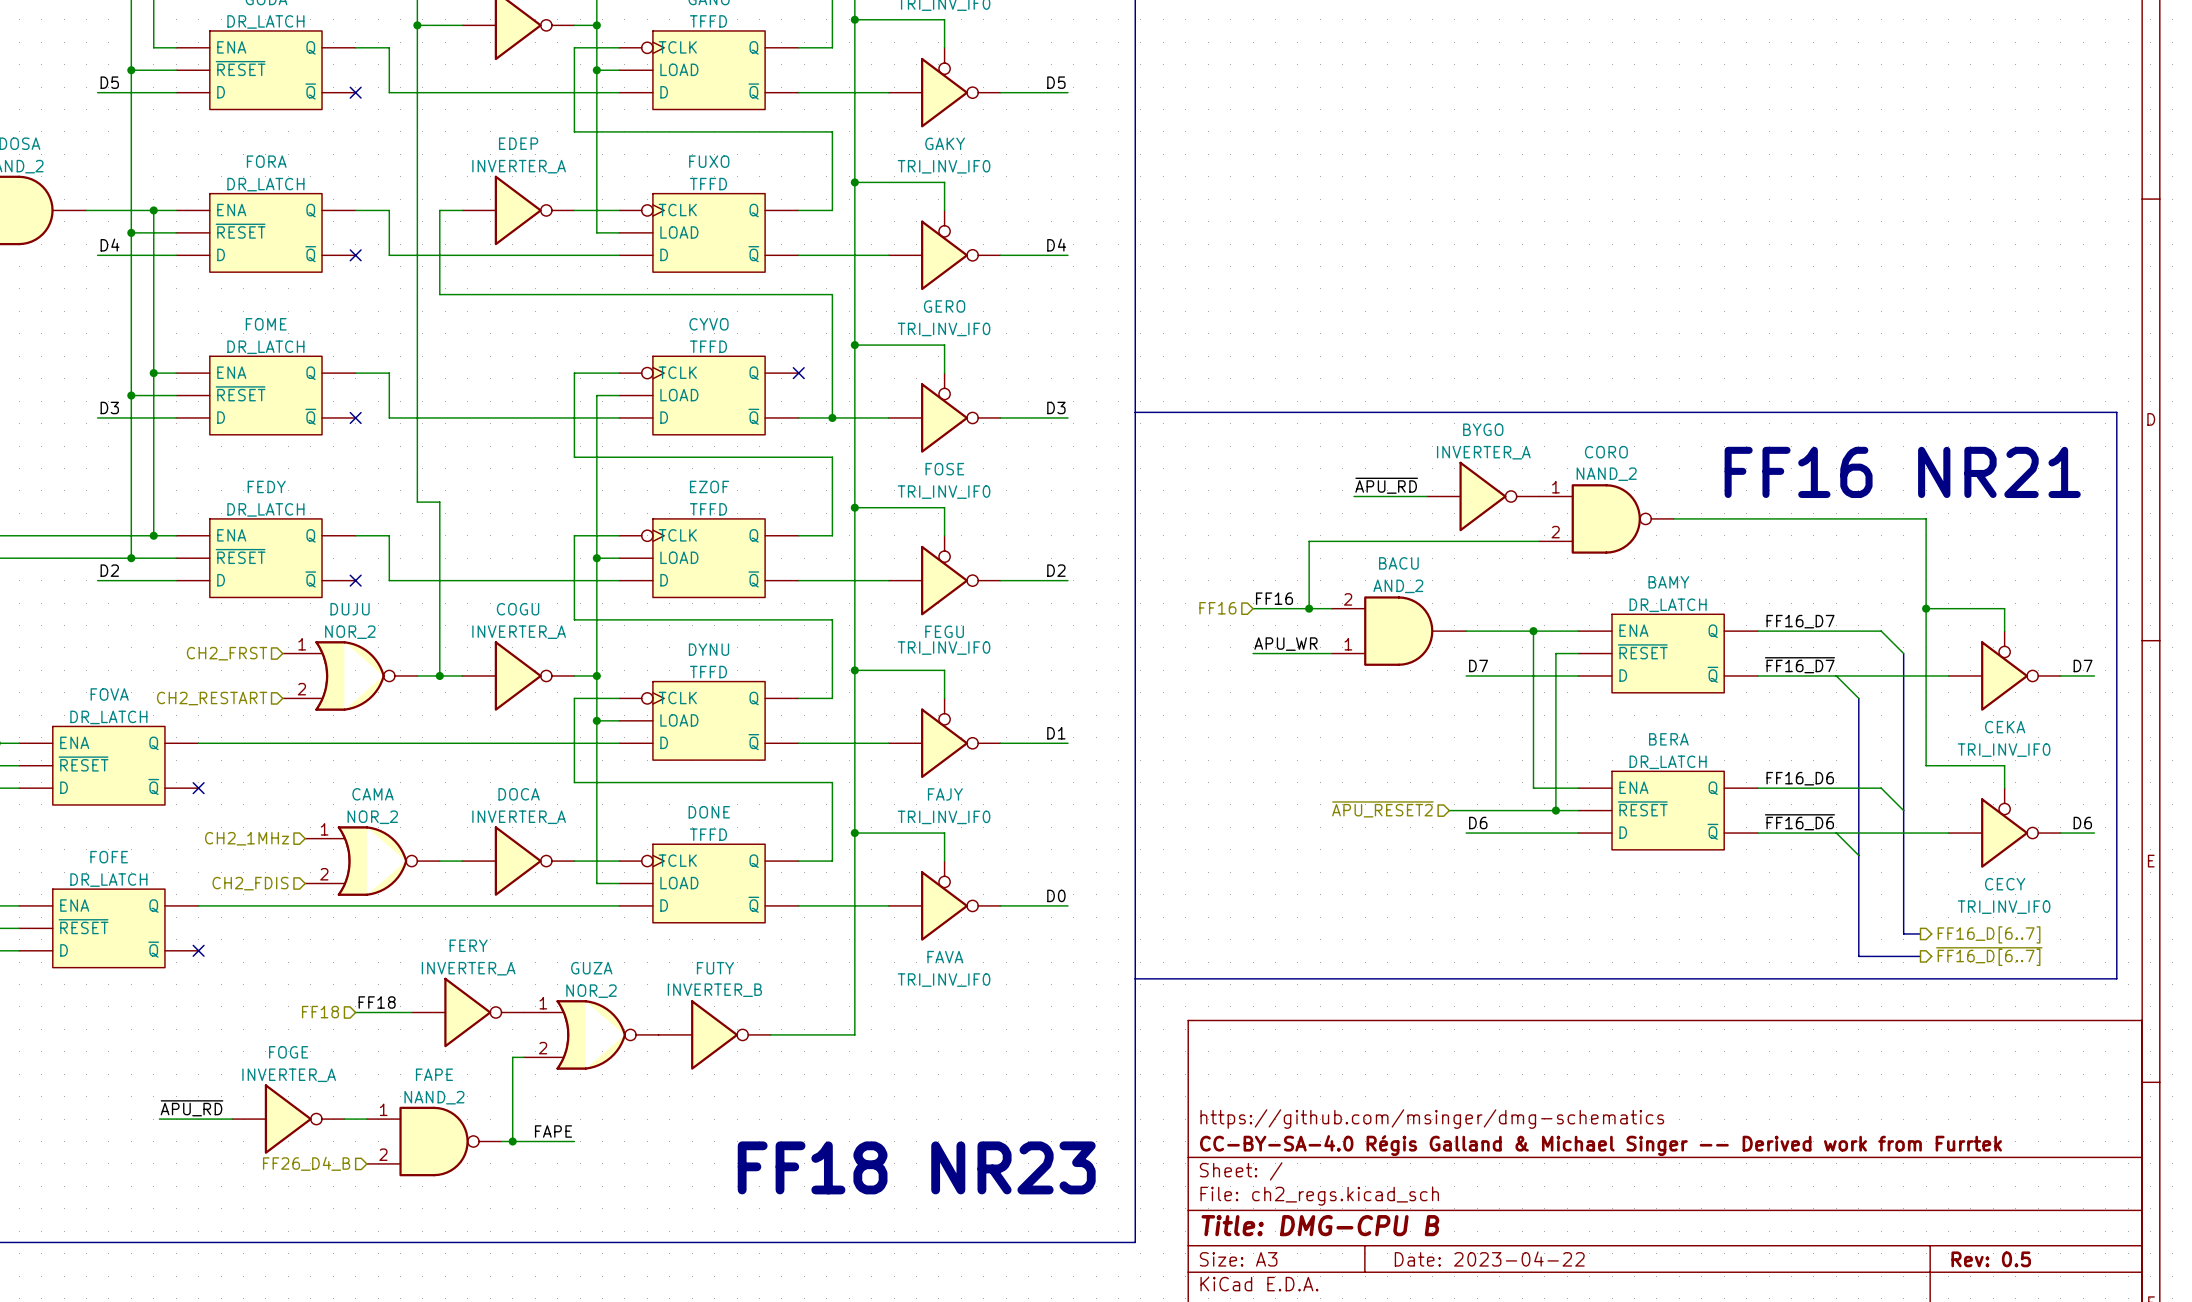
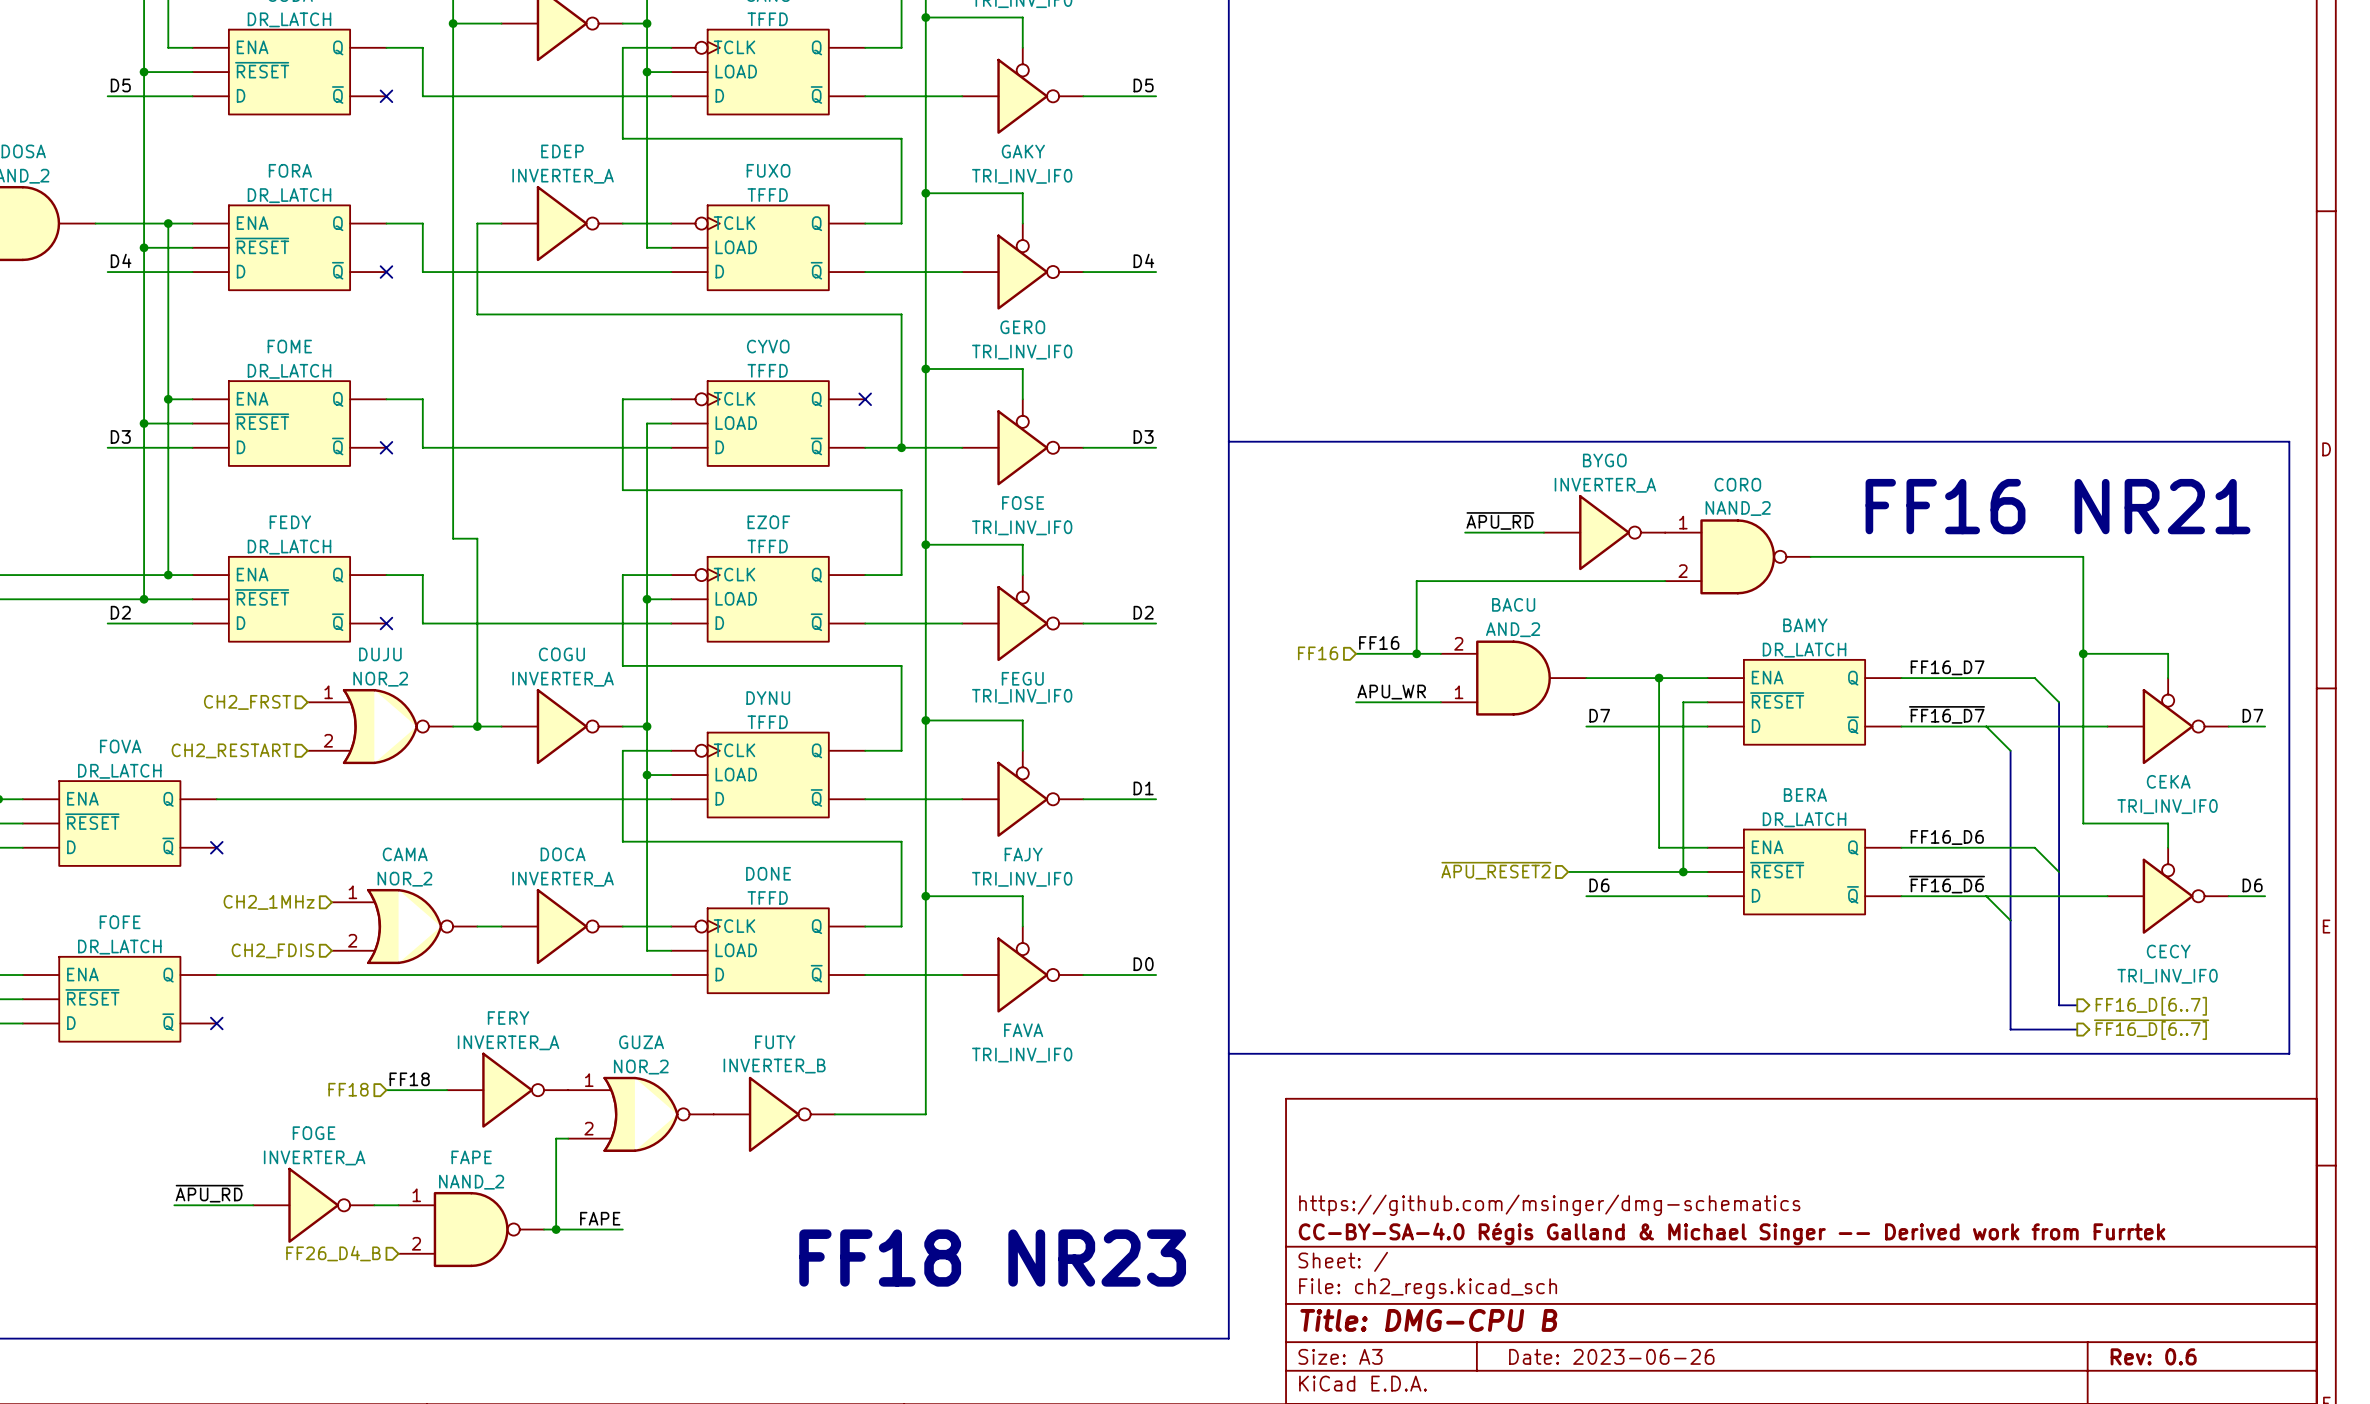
title block: Date: 2023-04-22 (1489, 1259) -> Date: 2023-06-26 (1611, 1356)
title block: Rev: 0.5 (1991, 1259) -> Rev: 0.6 (2153, 1356)

